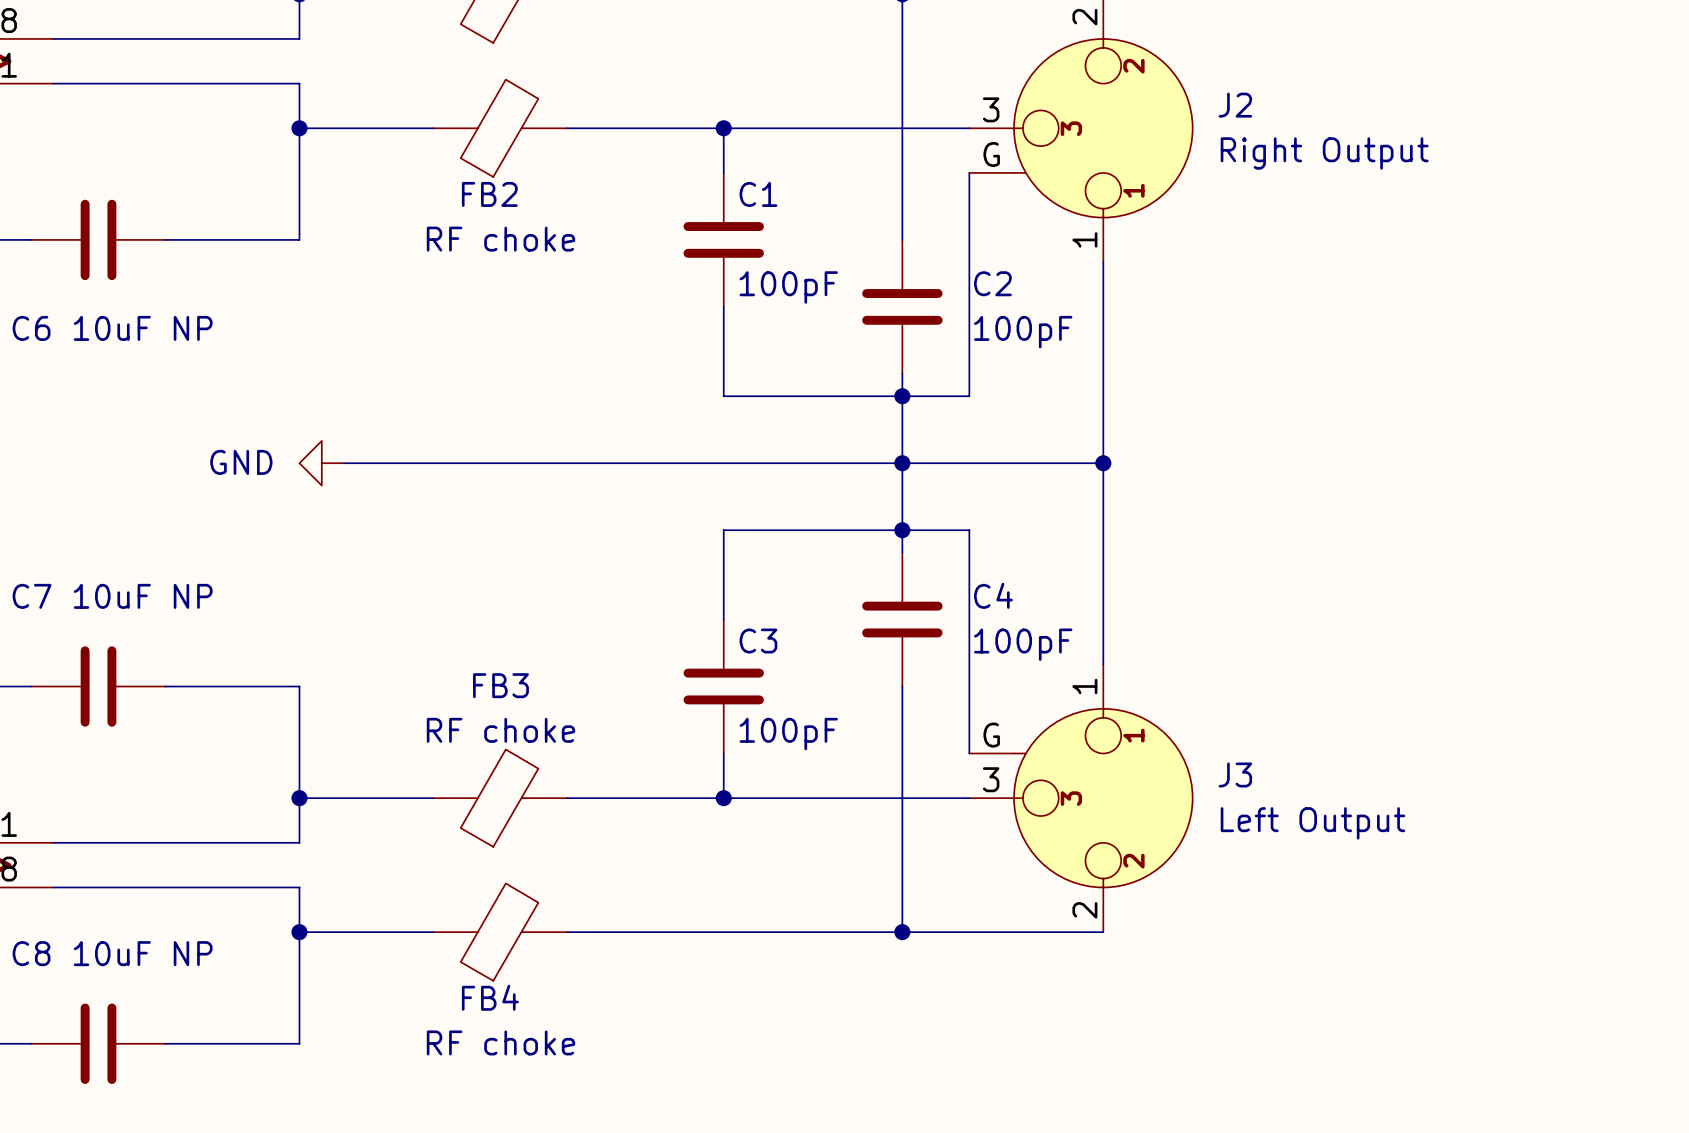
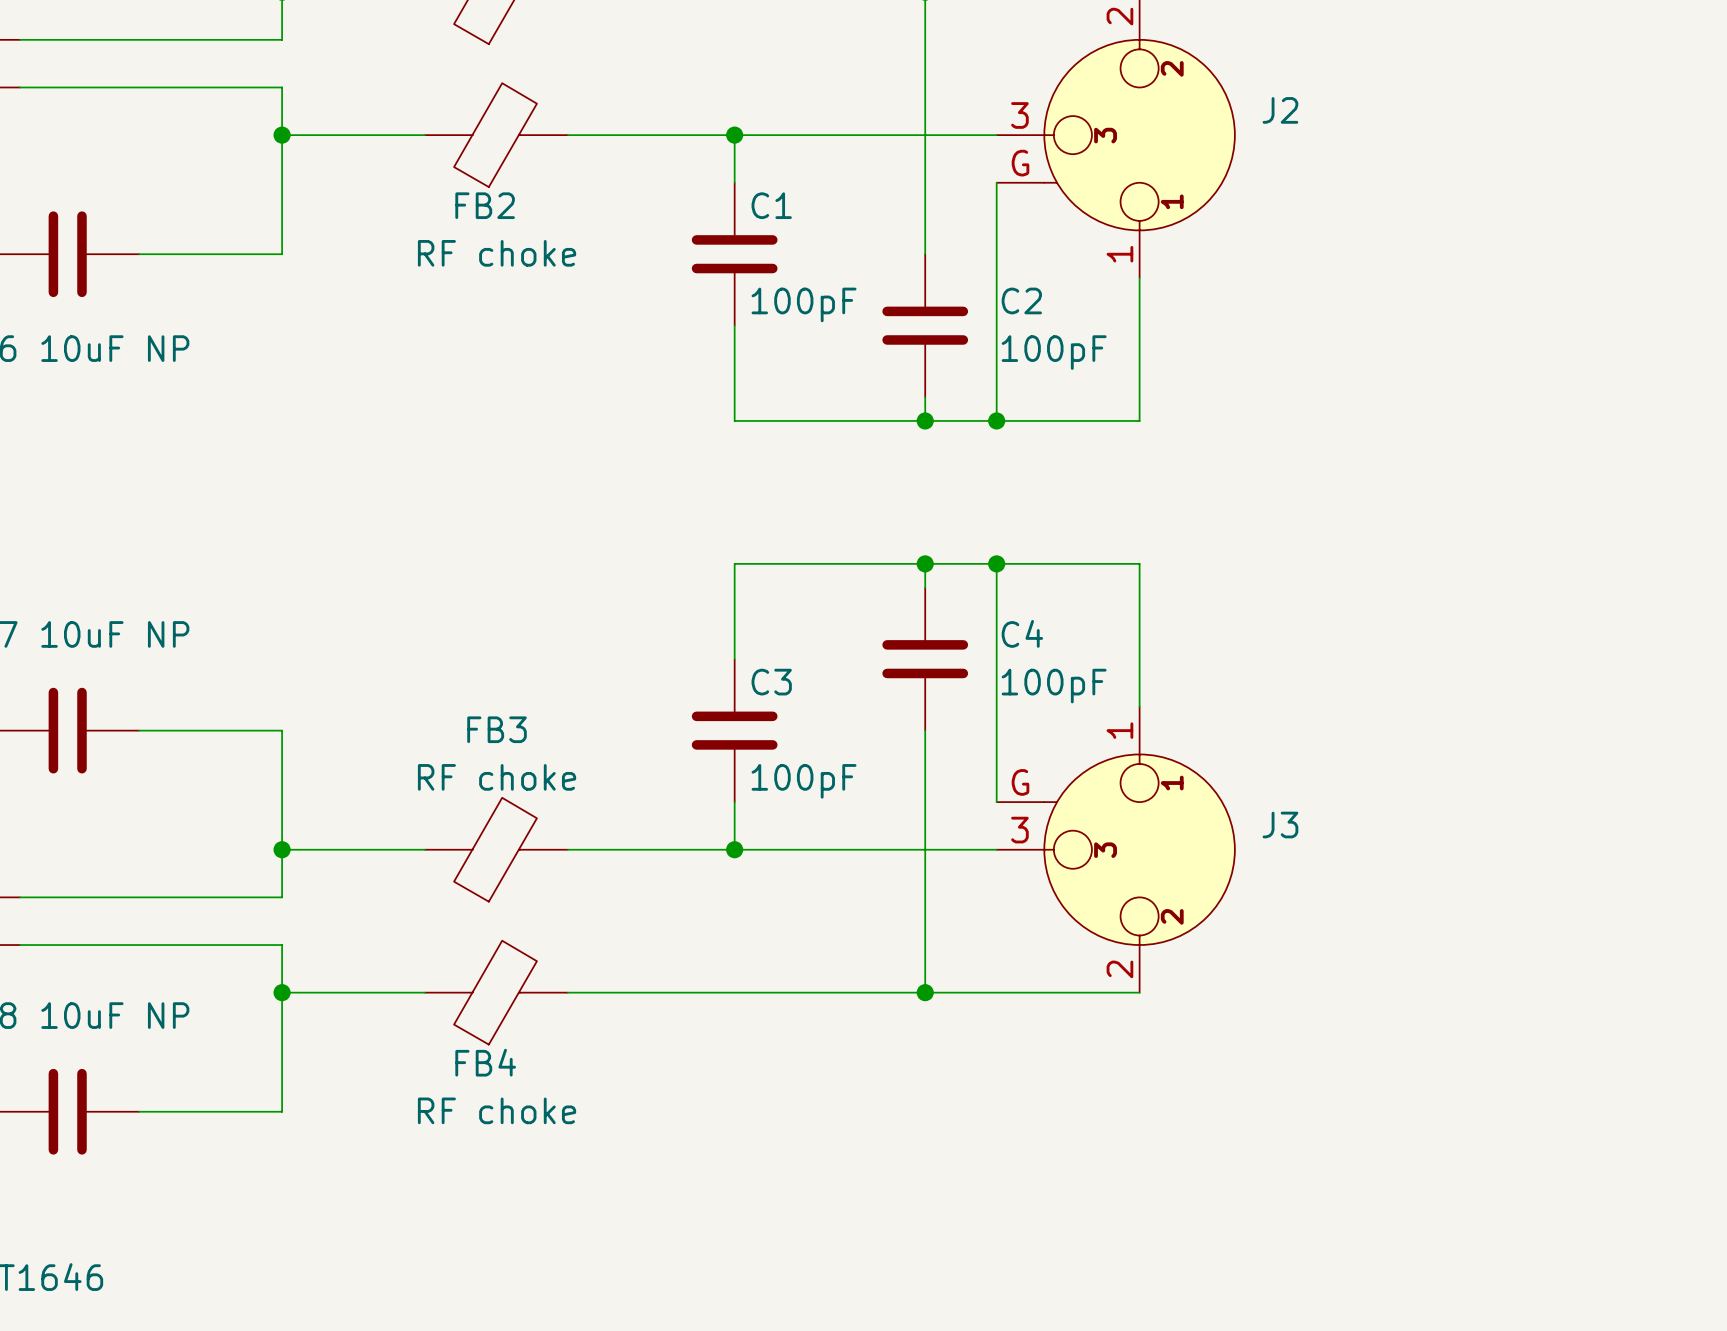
J2 value: Right Output (1324, 153) -> none
wire: (902, 396) (902, 530) -> none
junction: none -> (996, 420)
wire: (1103, 396) (1103, 530) -> (1139, 420) (996, 420)
power symbol: GND (321, 463) -> none
wire: (344, 463) (1103, 463) -> none
junction: (902, 463) -> none
junction: (1103, 463) -> none
wire: none -> (996, 563) (1139, 563)
junction: none -> (996, 563)
J3 value: Left Output (1312, 823) -> none

